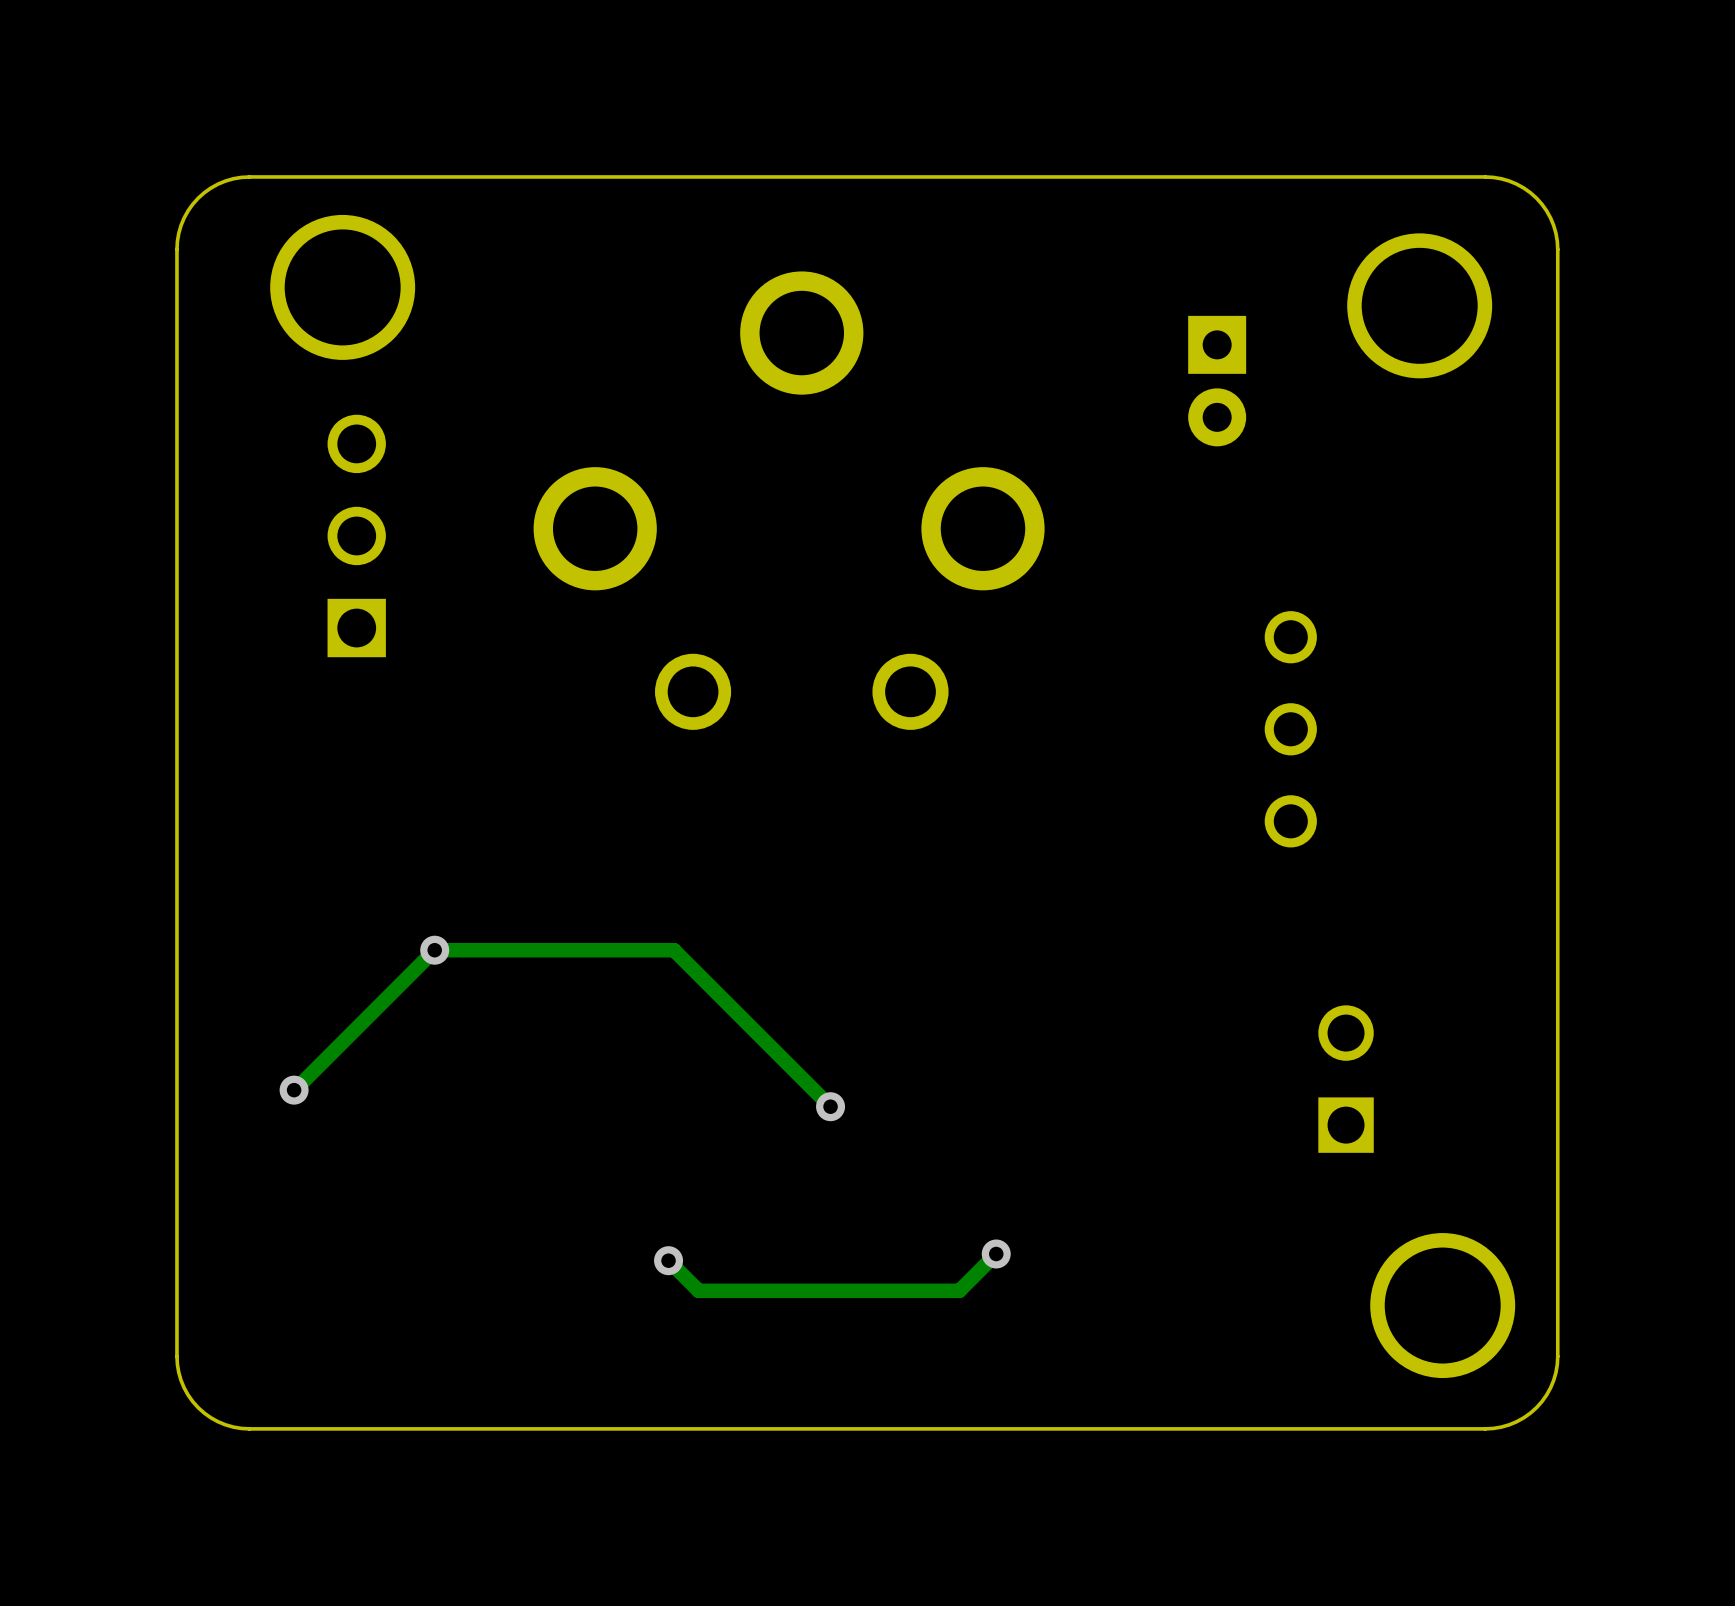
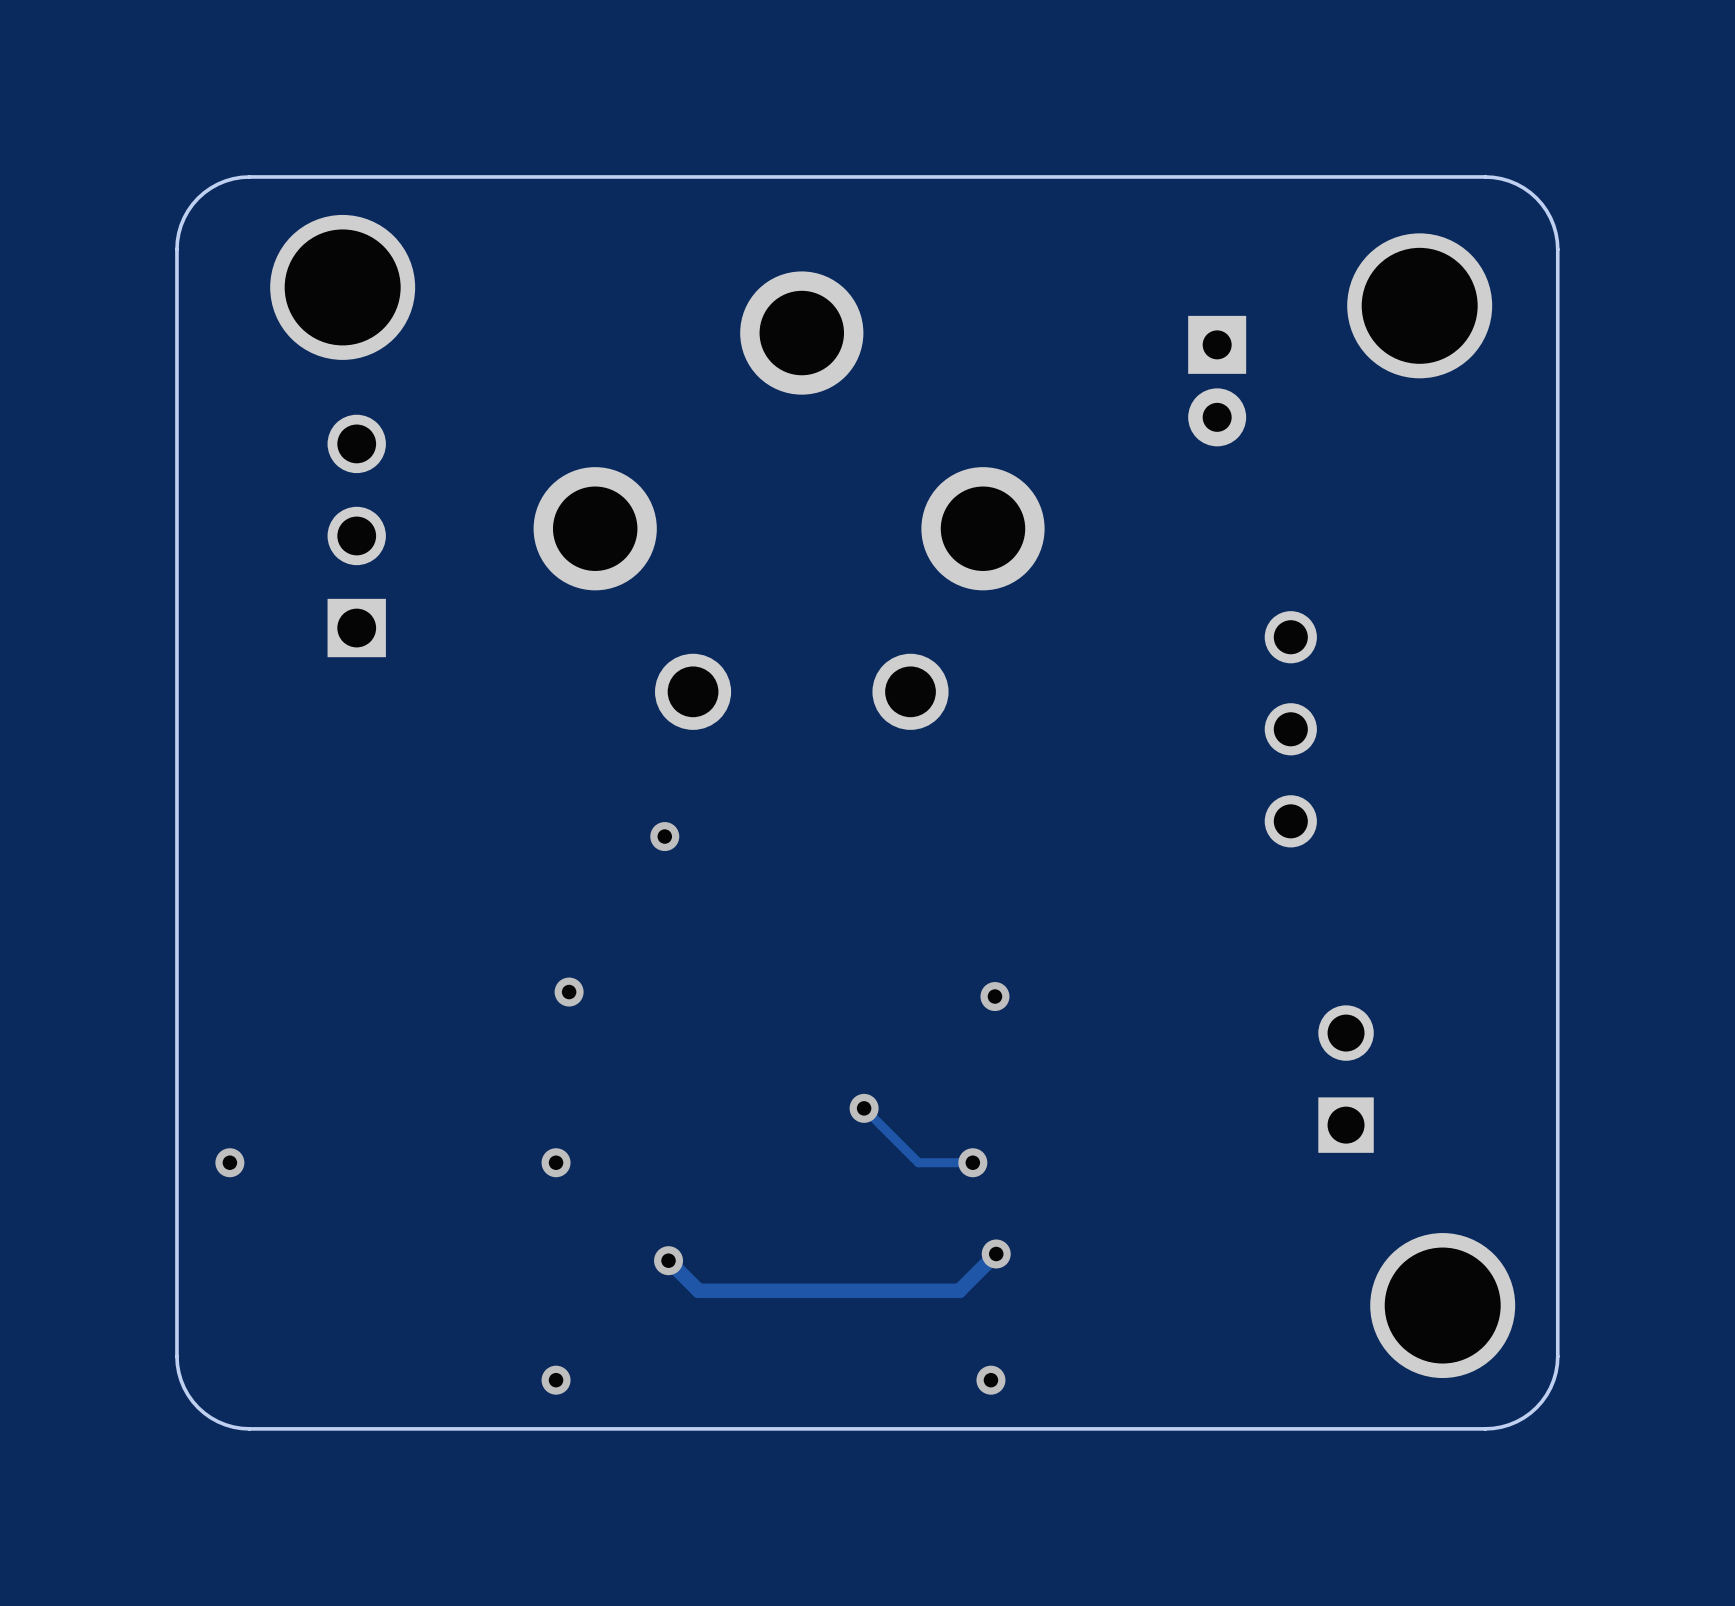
via: none -> (664, 836)
via: (434, 950) -> none
via: none -> (569, 992)
via: none -> (994, 996)
track: (294, 1090) (434, 950) (674, 950) (830, 1106) -> none
via position: (294, 1090) -> (229, 1162)
via position: (830, 1106) -> (864, 1108)
track: none -> (864, 1108) (918, 1162) (972, 1162)
via: none -> (556, 1162)
via: none -> (972, 1162)
via: none -> (556, 1380)
via: none -> (990, 1380)

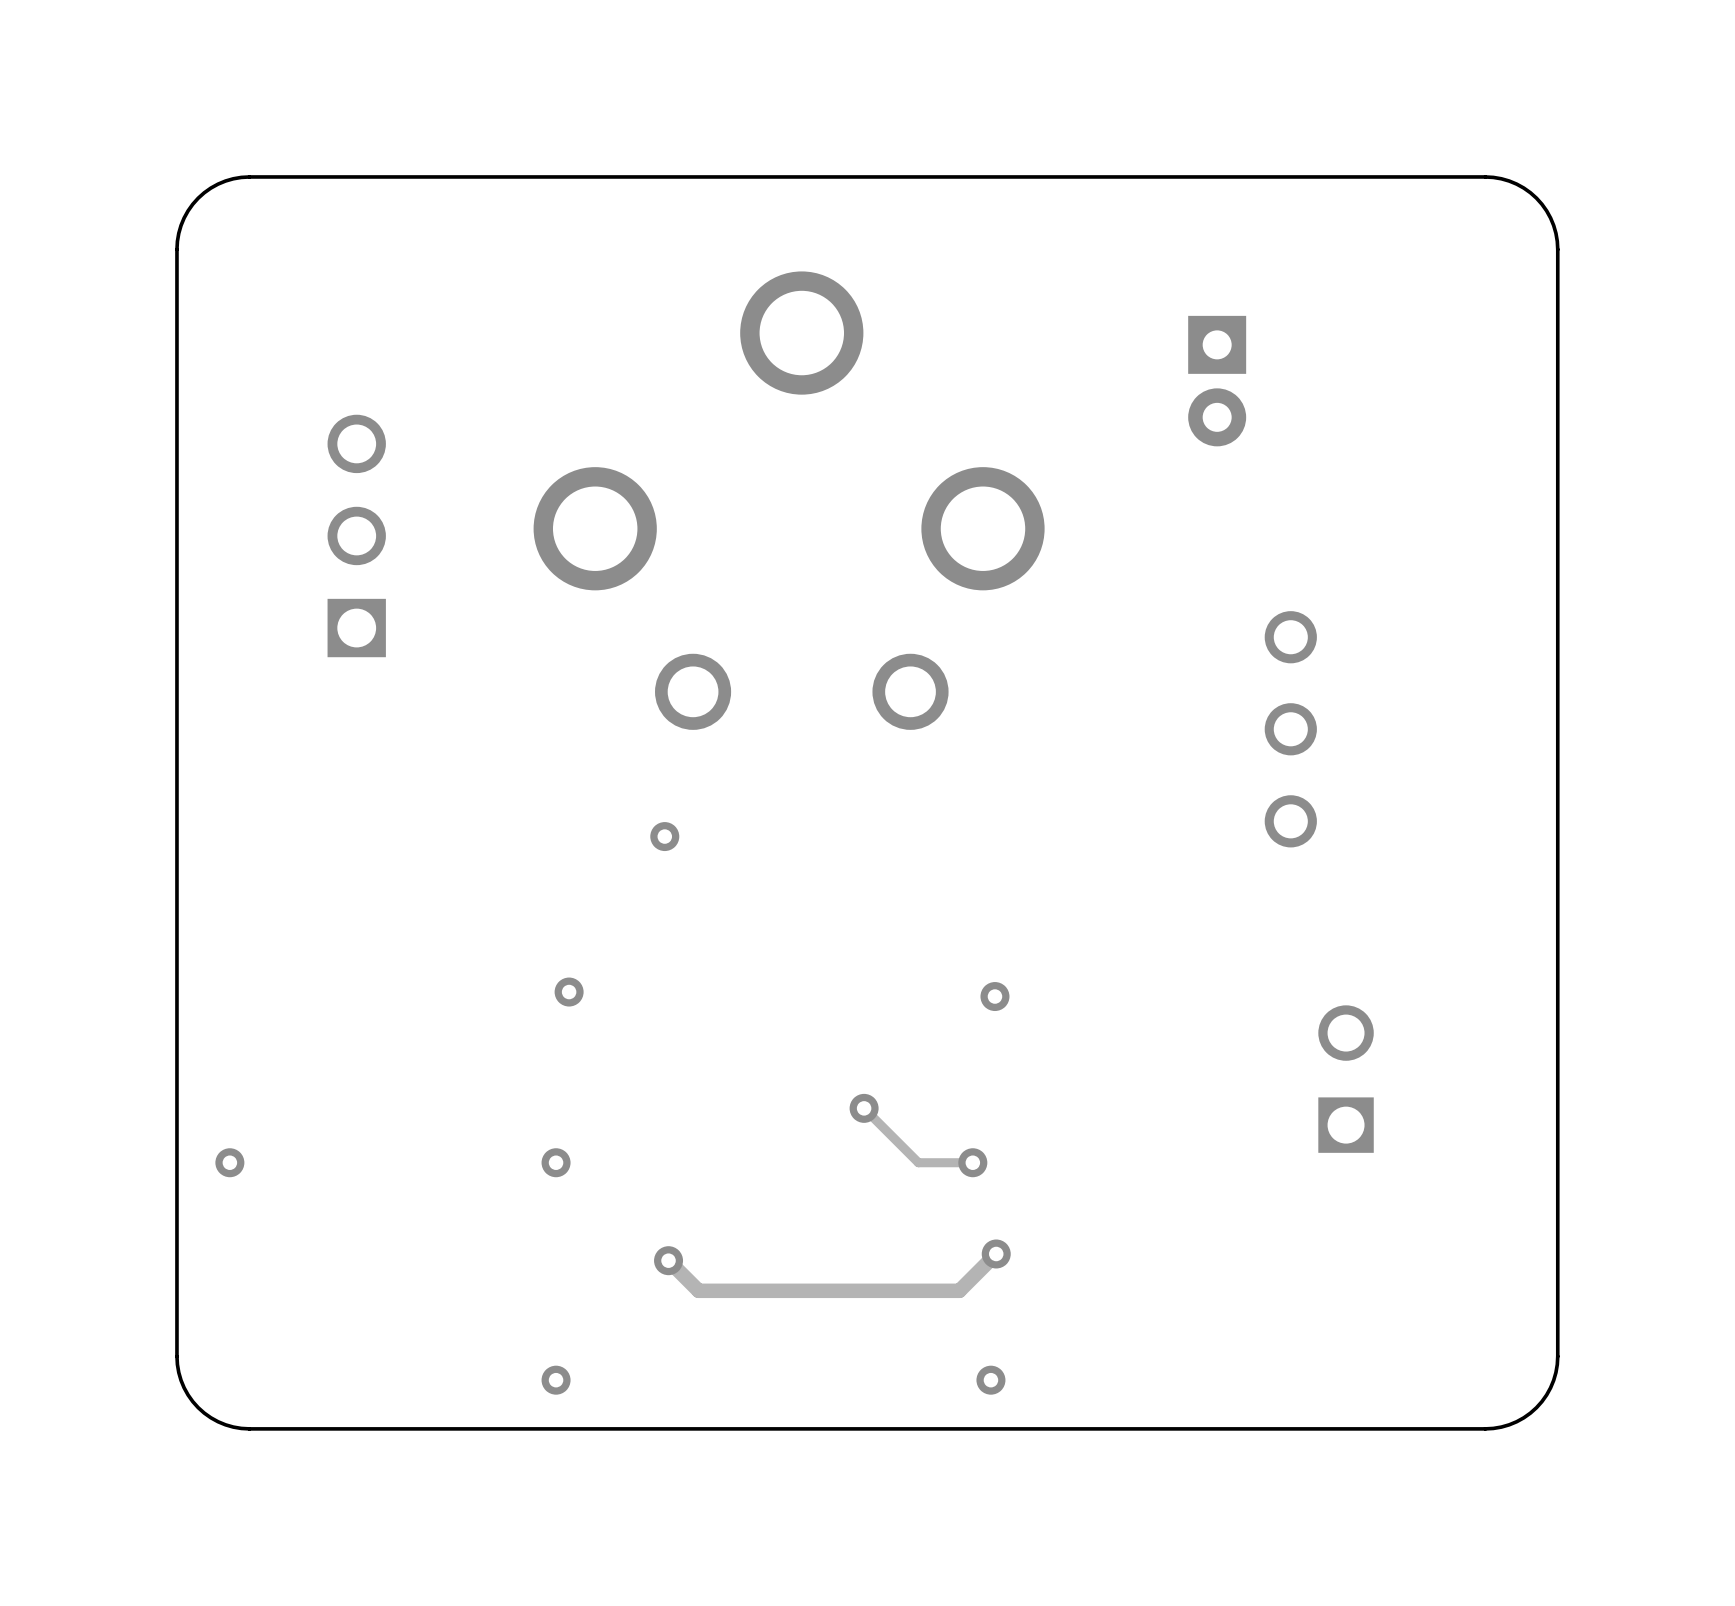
part: (342, 287) -> none
part: (1419, 305) -> none
part: (1442, 1305) -> none

